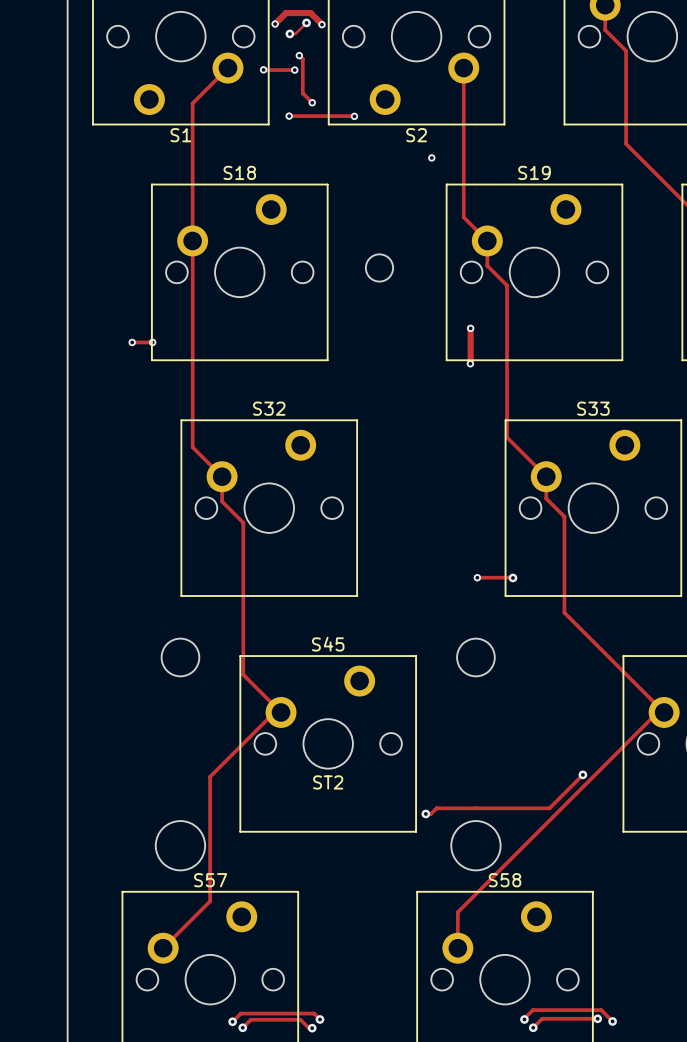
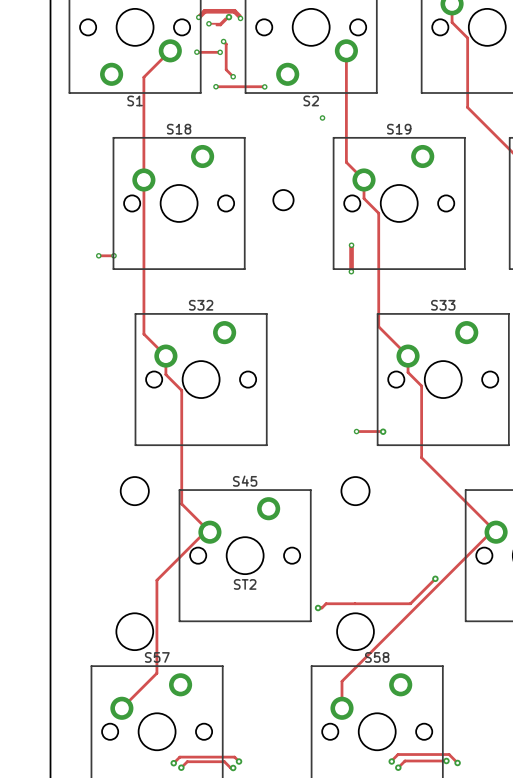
track: none -> (239, 16) (234, 11) (204, 11) (198, 17)
via: none -> (198, 17)
track: (275, 24) (286, 13) (310, 13) (322, 24) -> none
via: (275, 24) -> none
track: none -> (225, 18) (220, 23) (208, 23)
via: none -> (208, 23)
via: (289, 33) -> none

